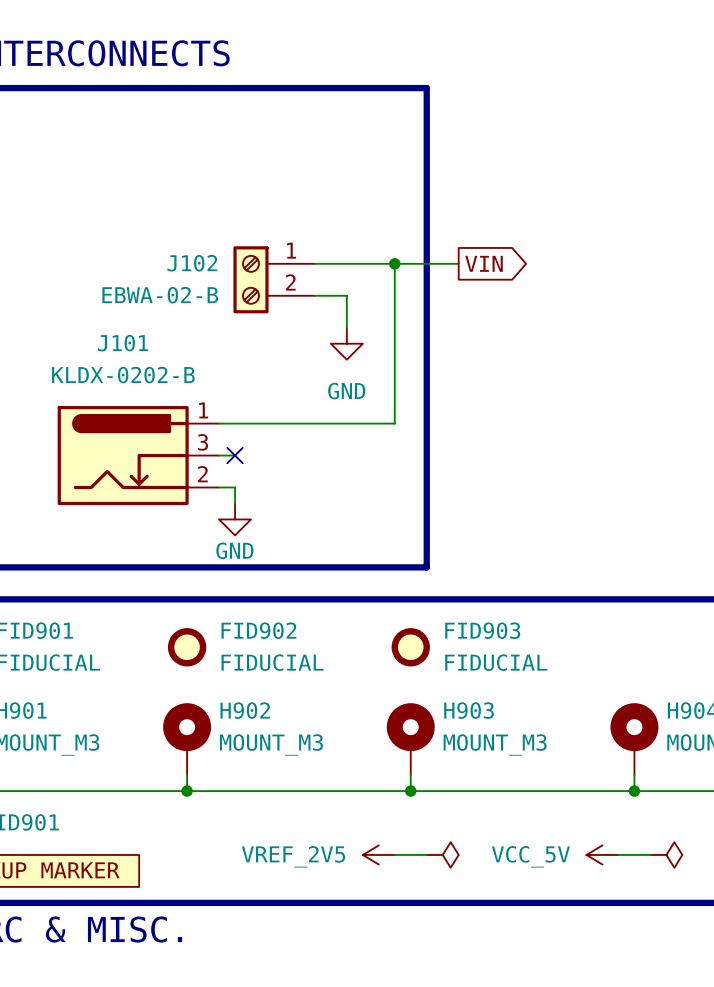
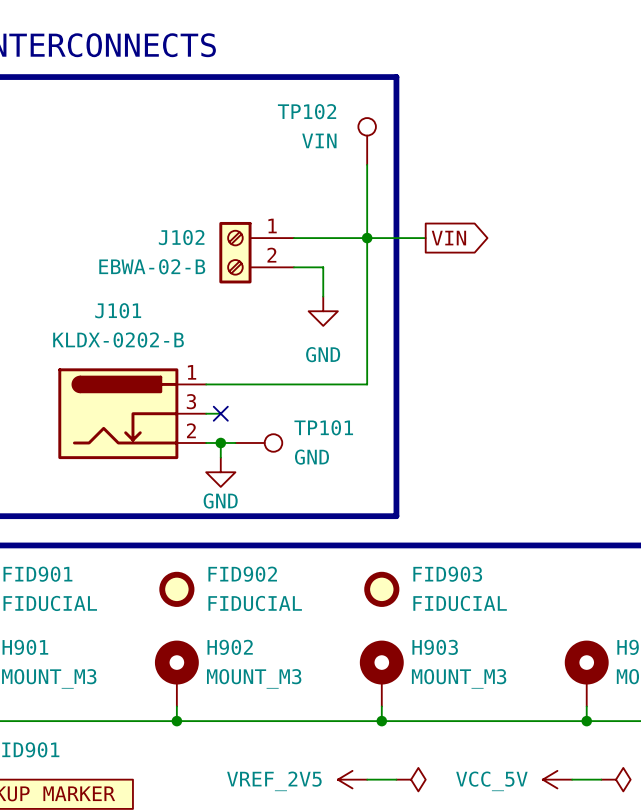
TP102: none -> VIN (367, 141)
wire: none -> (367, 164) (367, 238)
wire: none -> (220, 442) (235, 442)
junction: none -> (220, 442)
TP101: none -> GND (258, 442)

